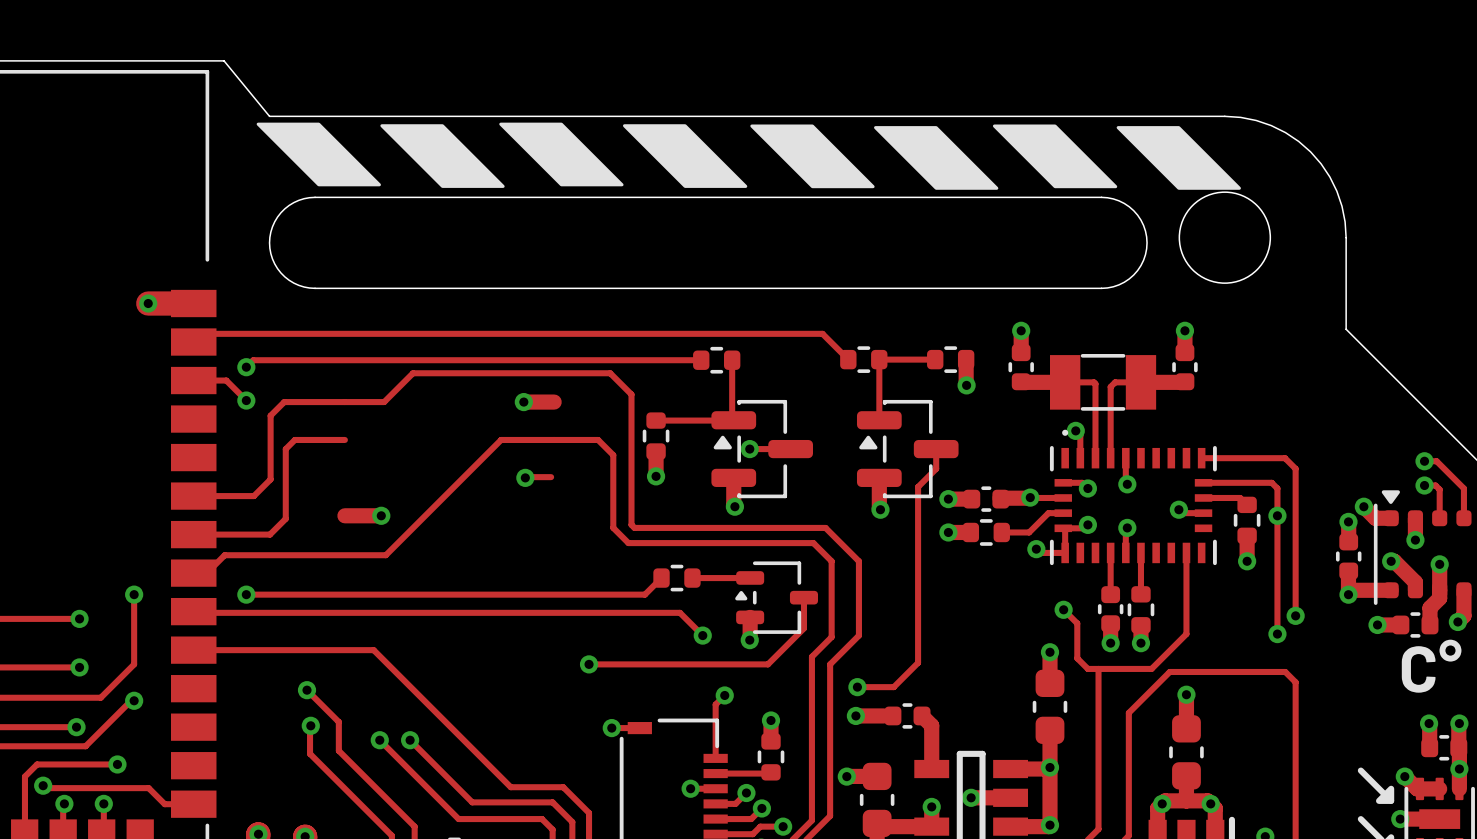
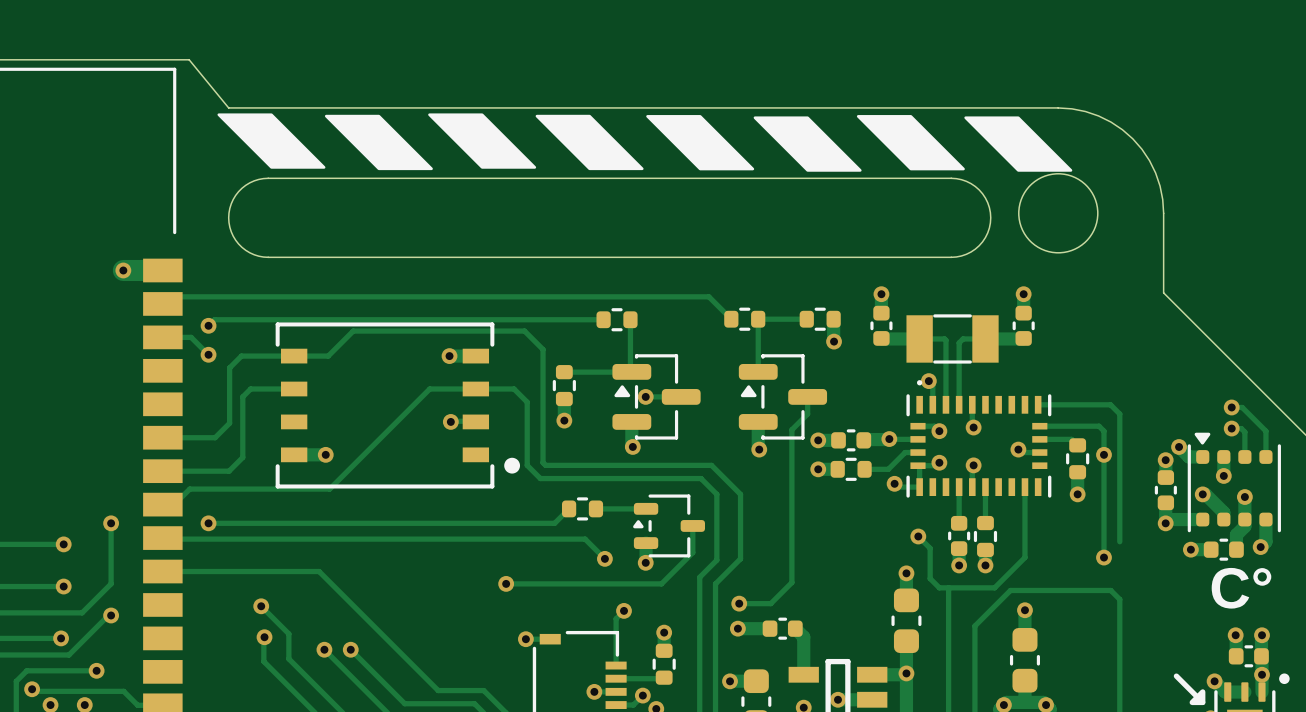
part: none -> (397, 405)
via: (1295, 615) -> none

